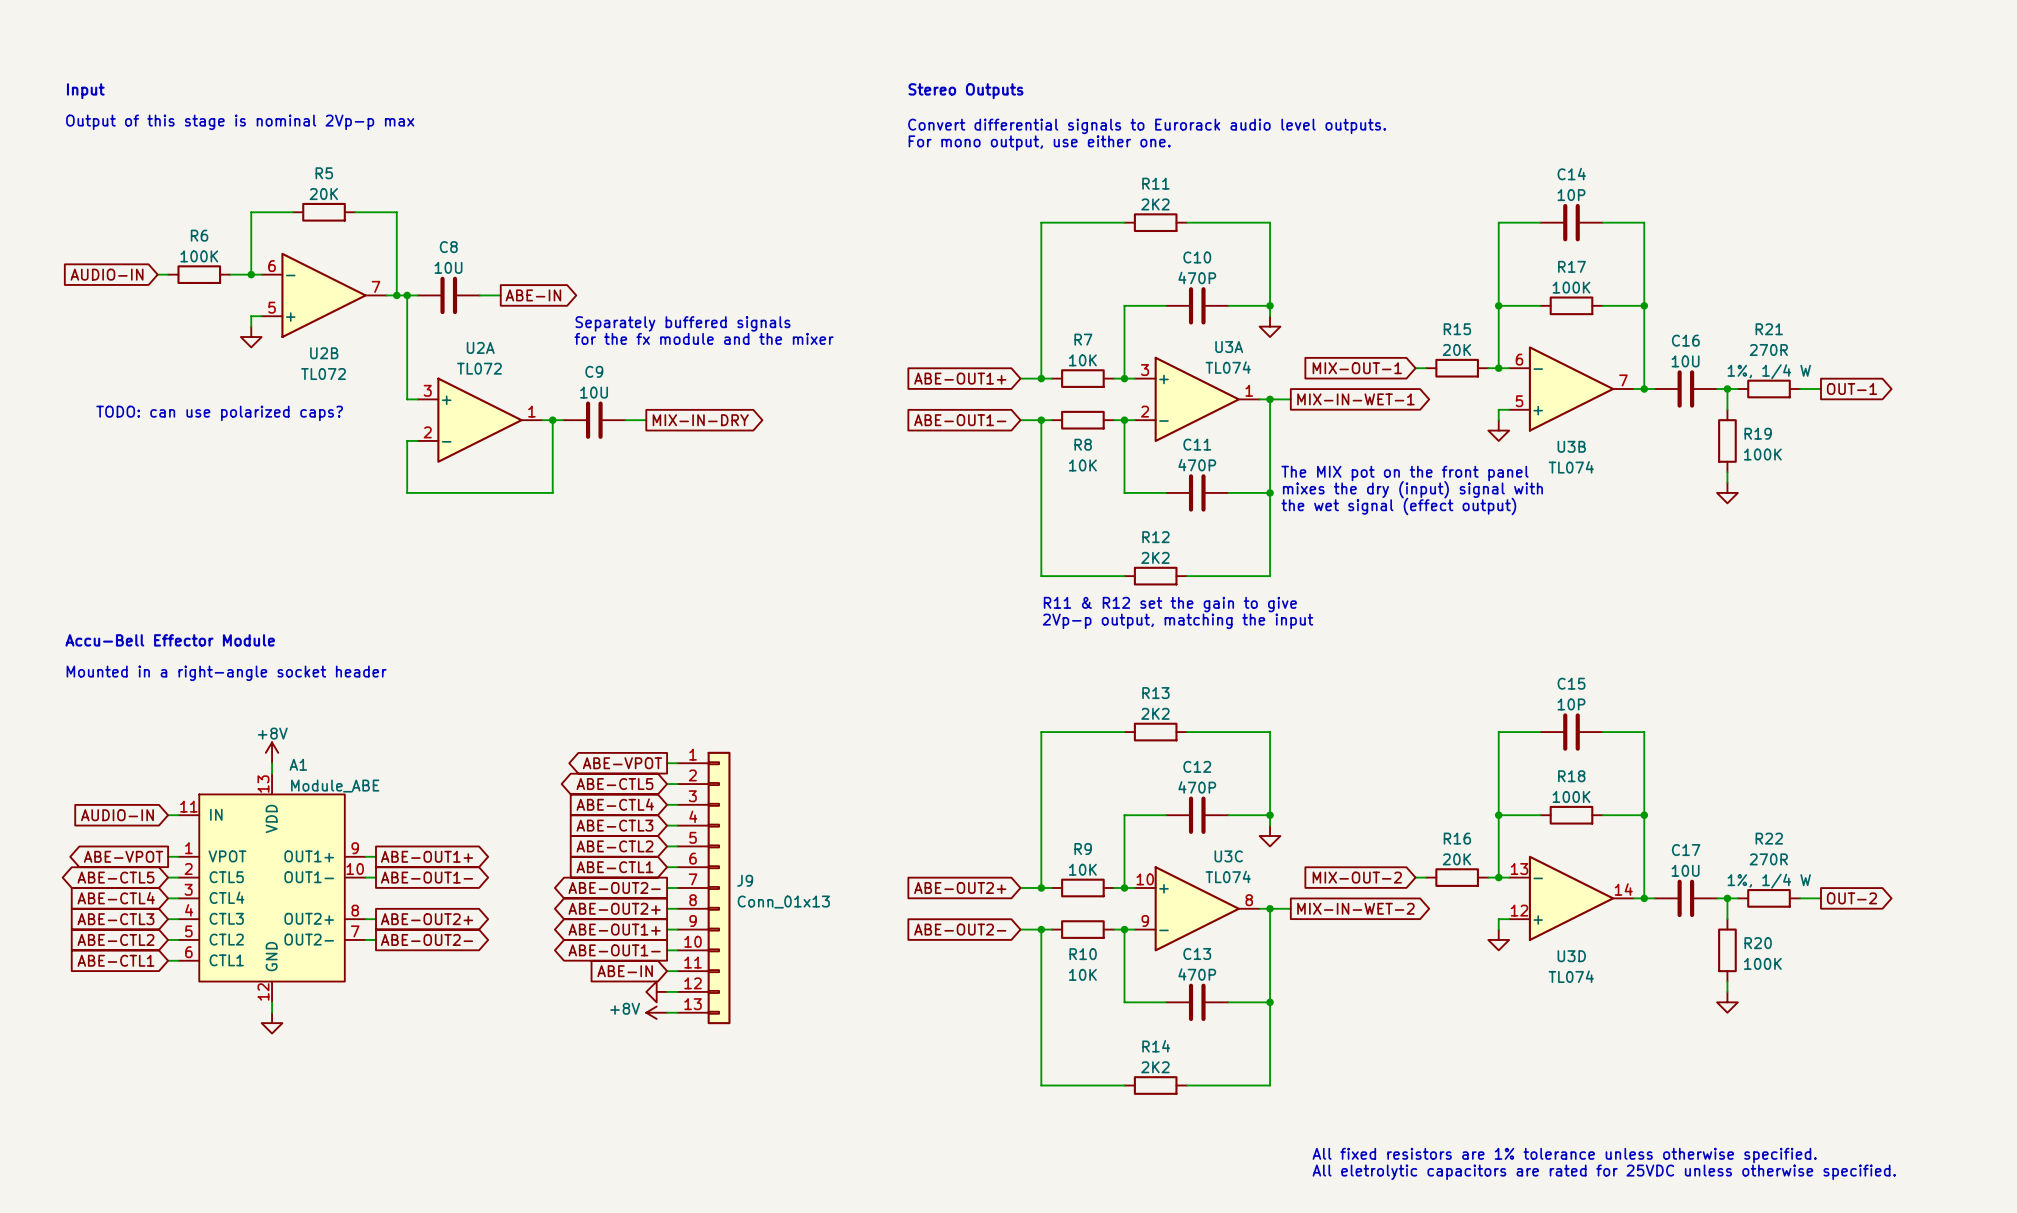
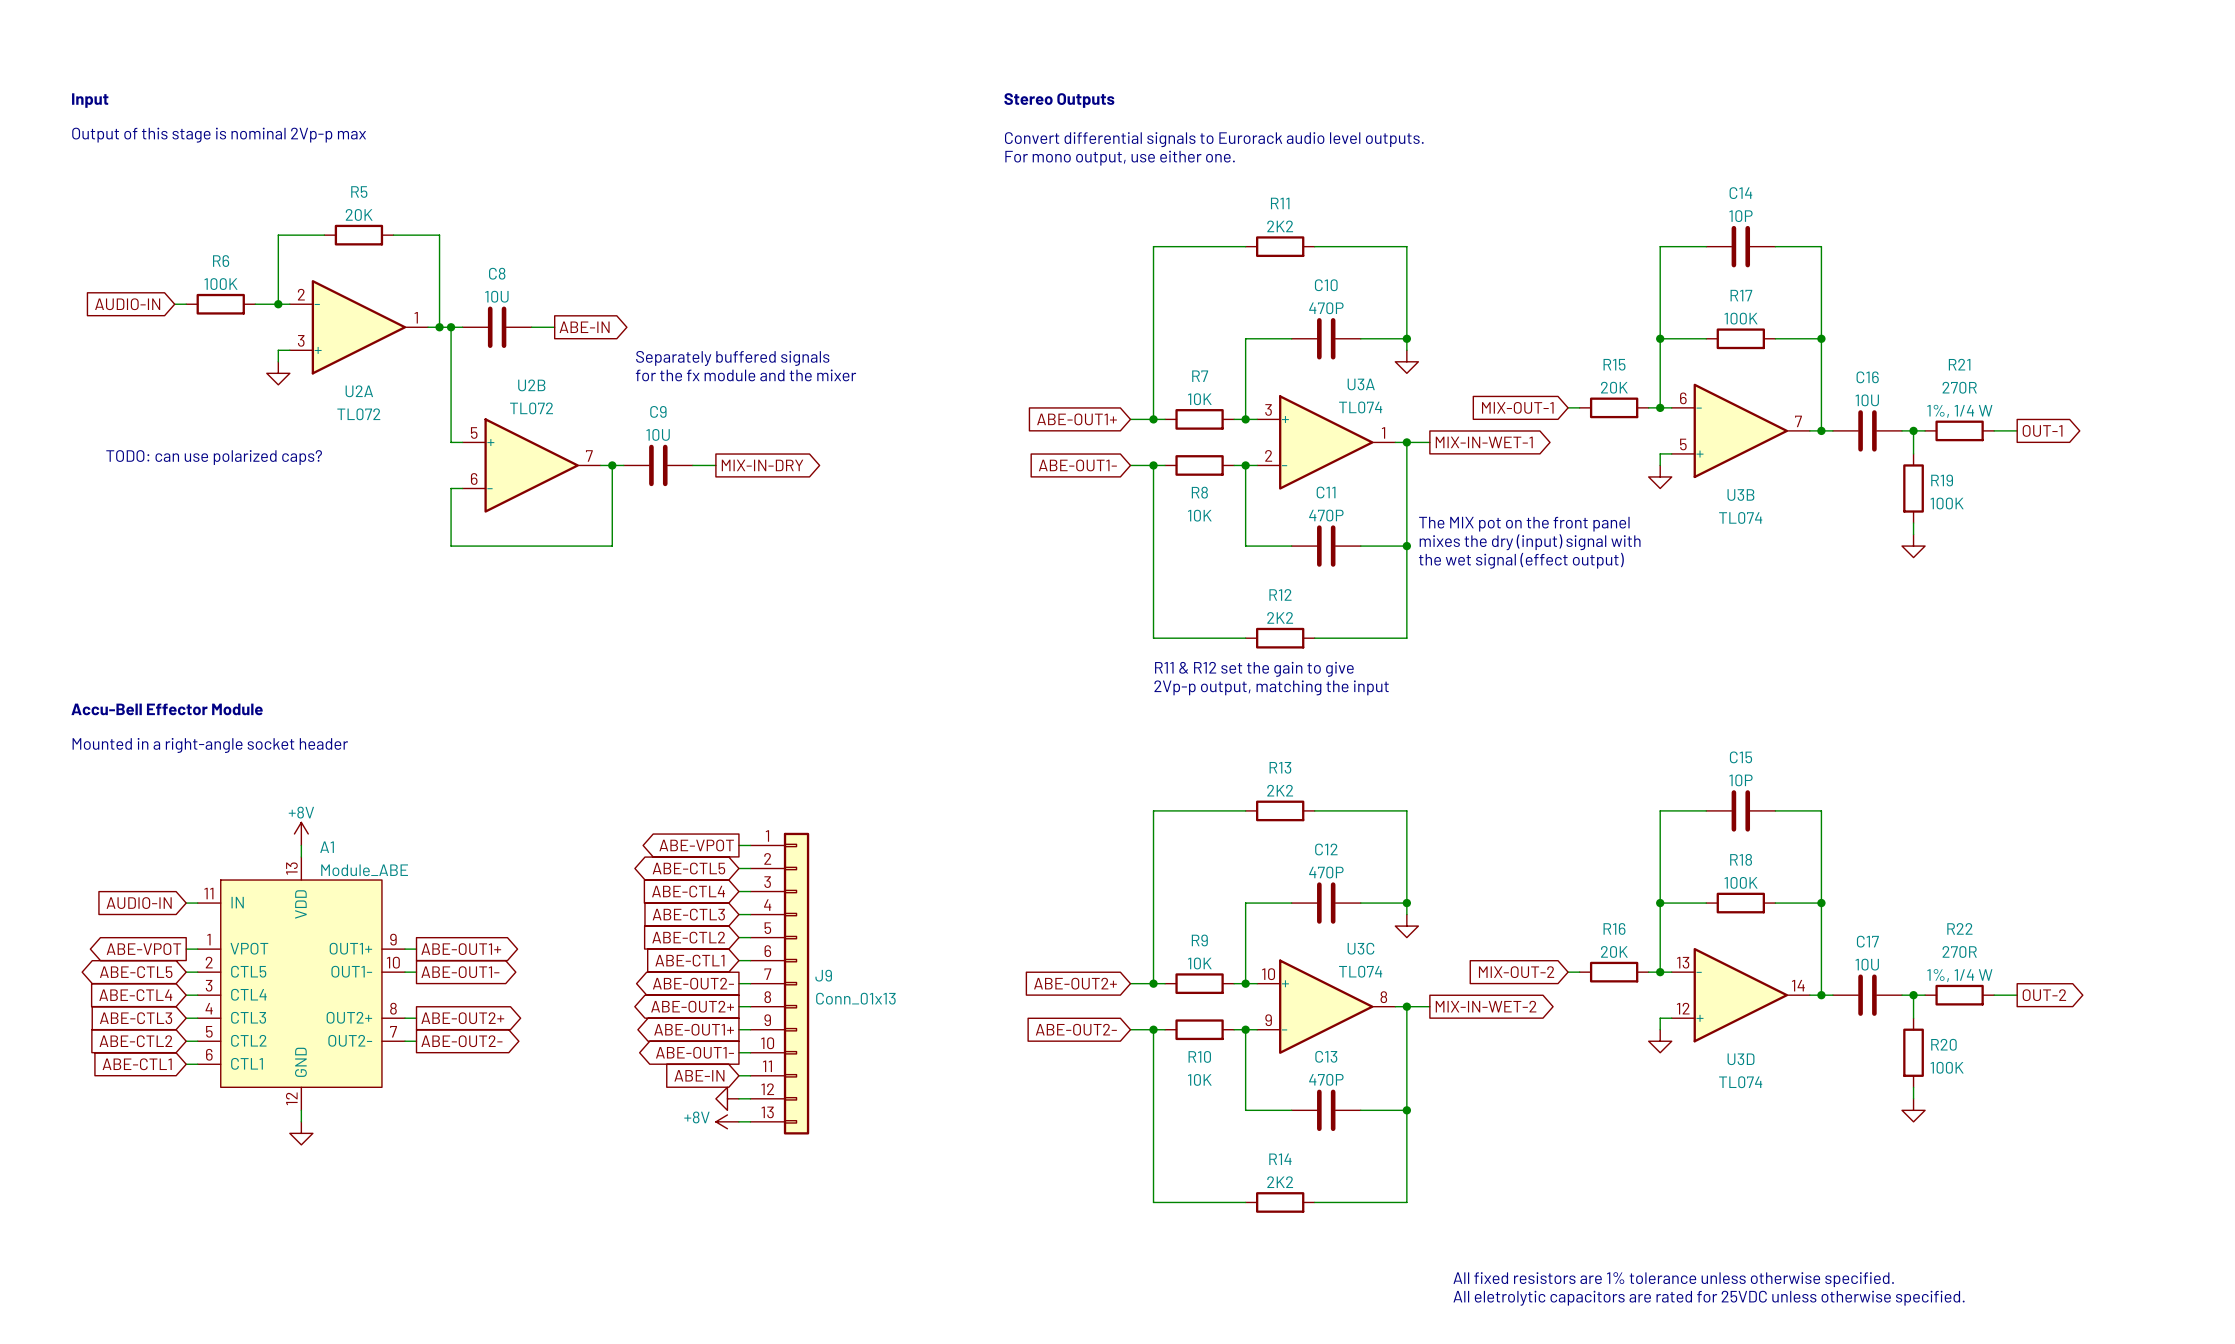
U2B flip: as is (324, 295) -> up-down (531, 465)
U2B position: (324, 295) -> (531, 465)
U2A flip: as is (479, 420) -> up-down (358, 327)
U2A position: (479, 420) -> (358, 327)

